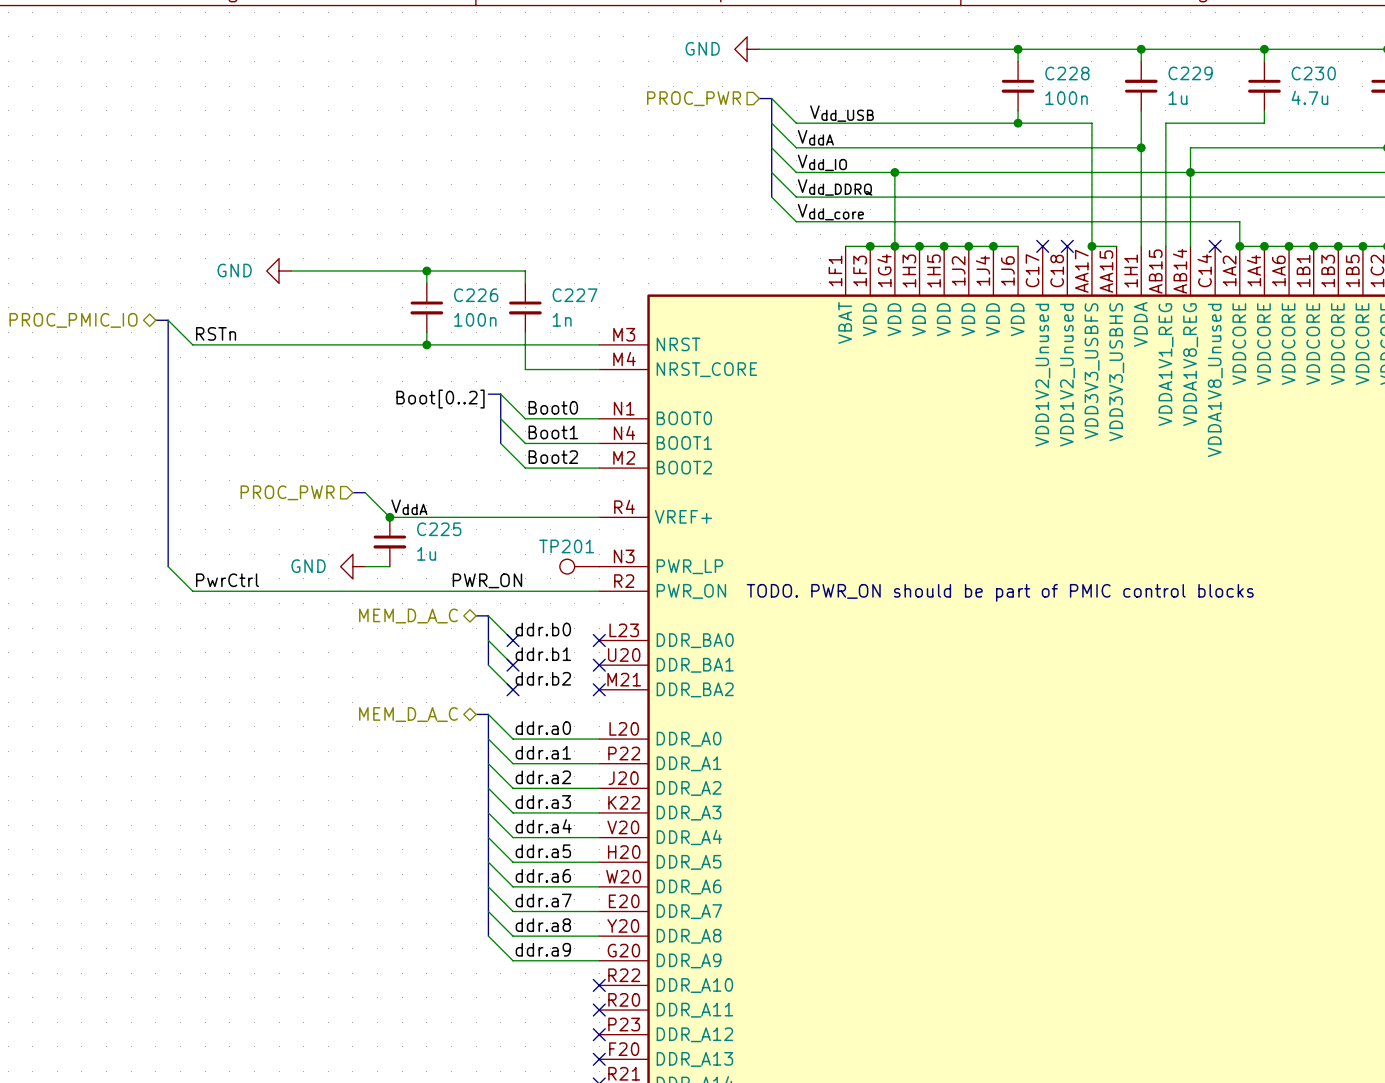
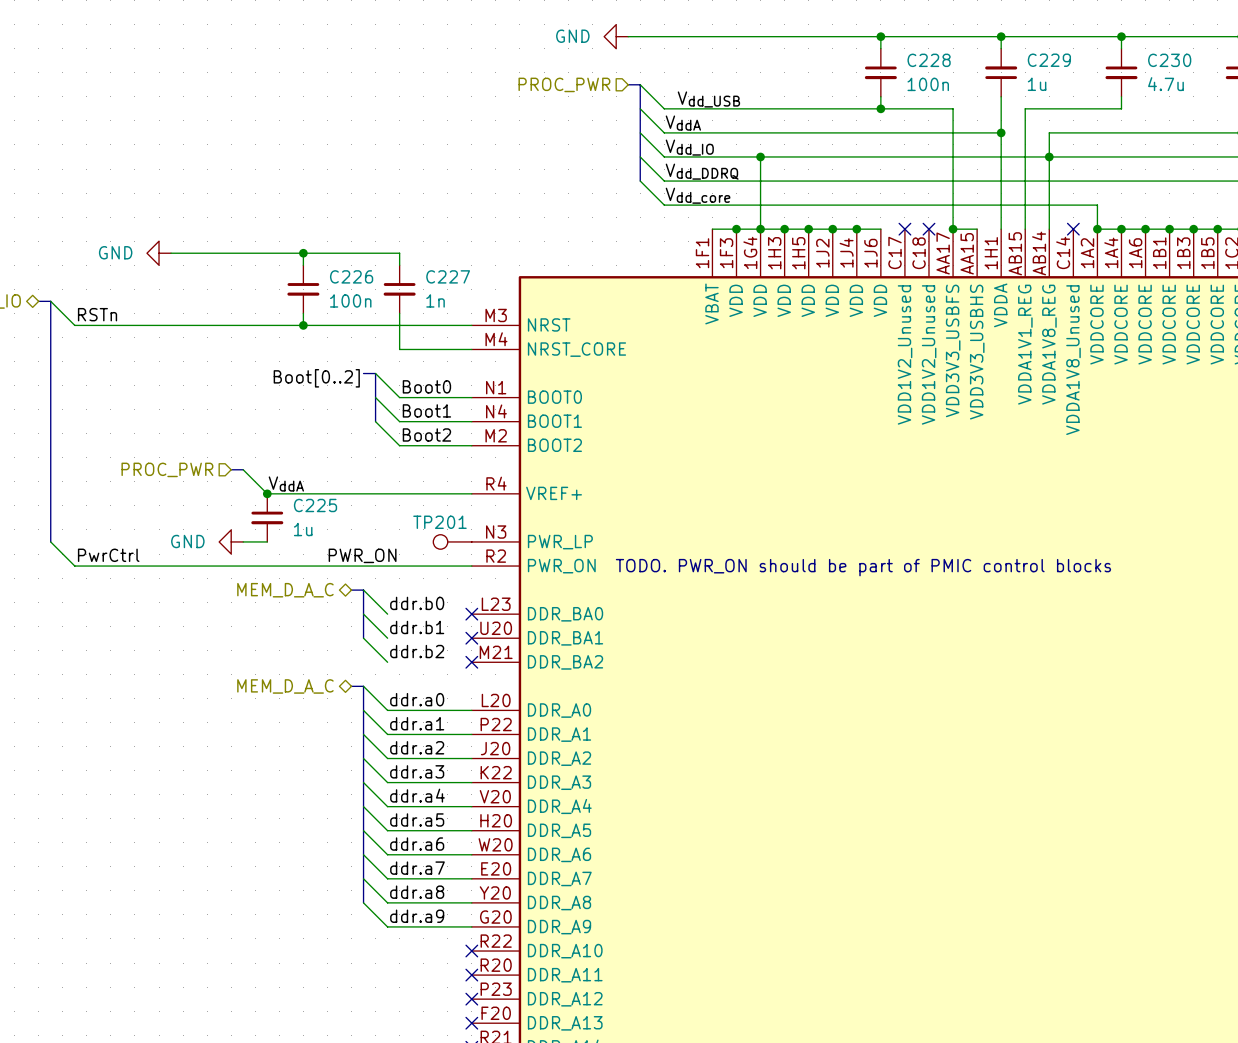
no-connect mark: (513, 640) -> none
no-connect mark: (513, 665) -> none
no-connect mark: (513, 689) -> none

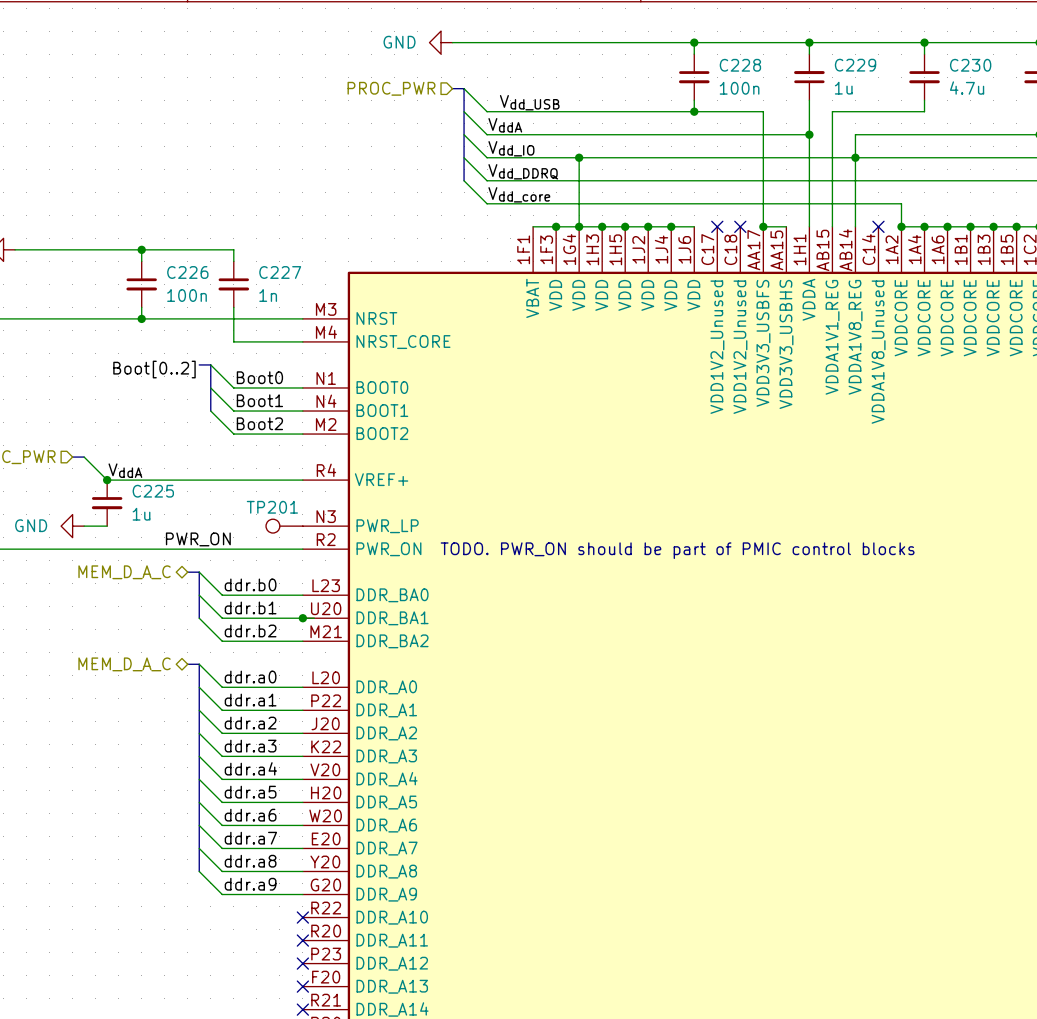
wire: none -> (222, 595) (302, 595)
no-connect mark: (471, 614) -> none
wire: none -> (222, 618) (314, 618)
no-connect mark: (471, 638) -> none
junction: none -> (302, 618)
wire: none -> (222, 641) (302, 641)
no-connect mark: (471, 662) -> none

